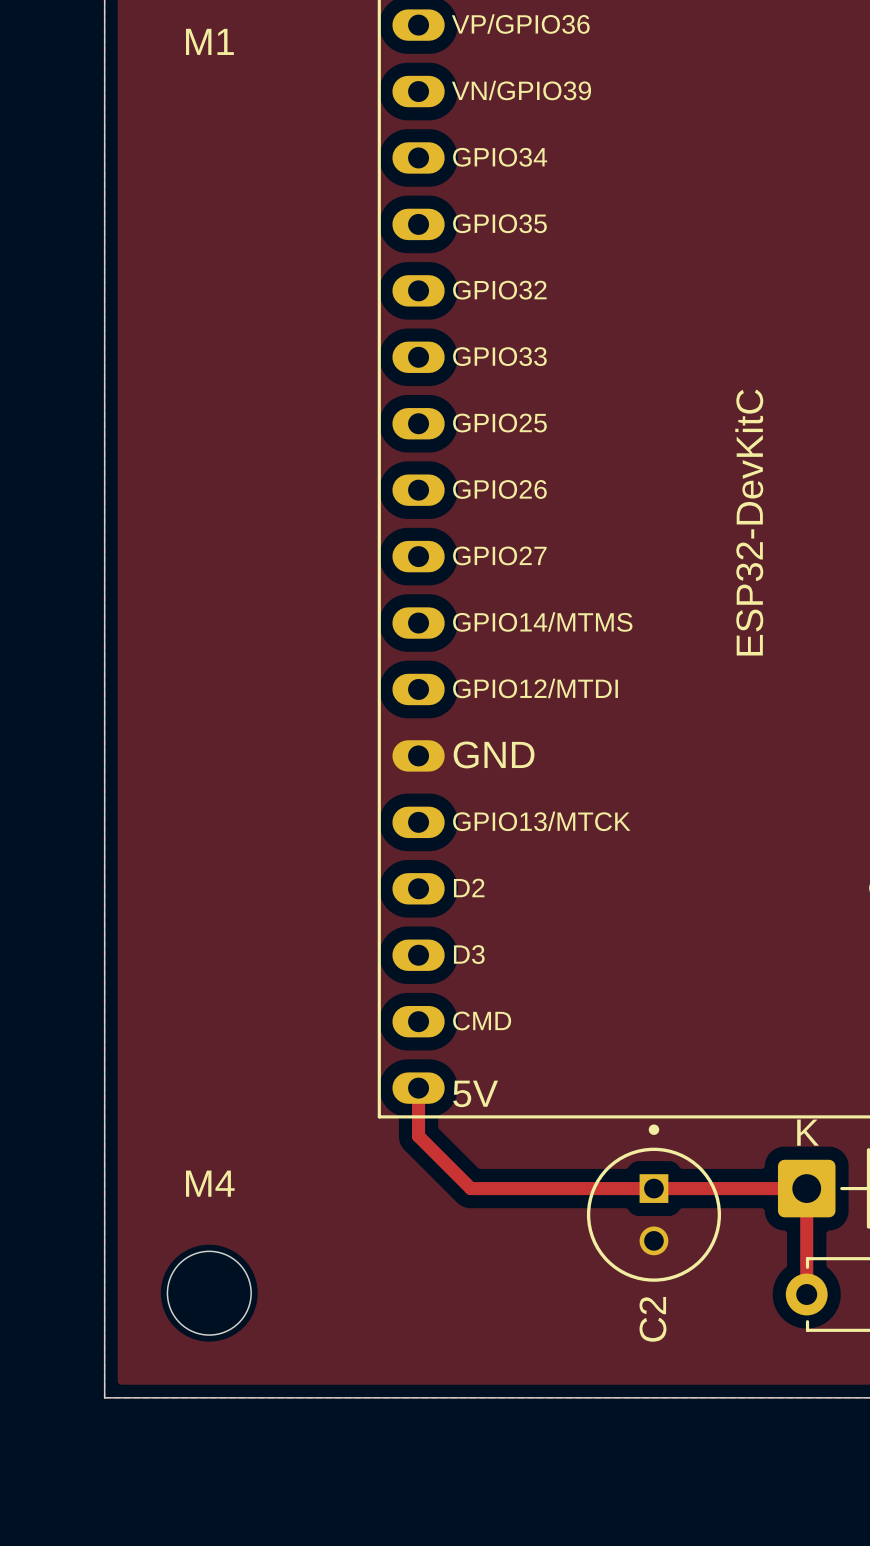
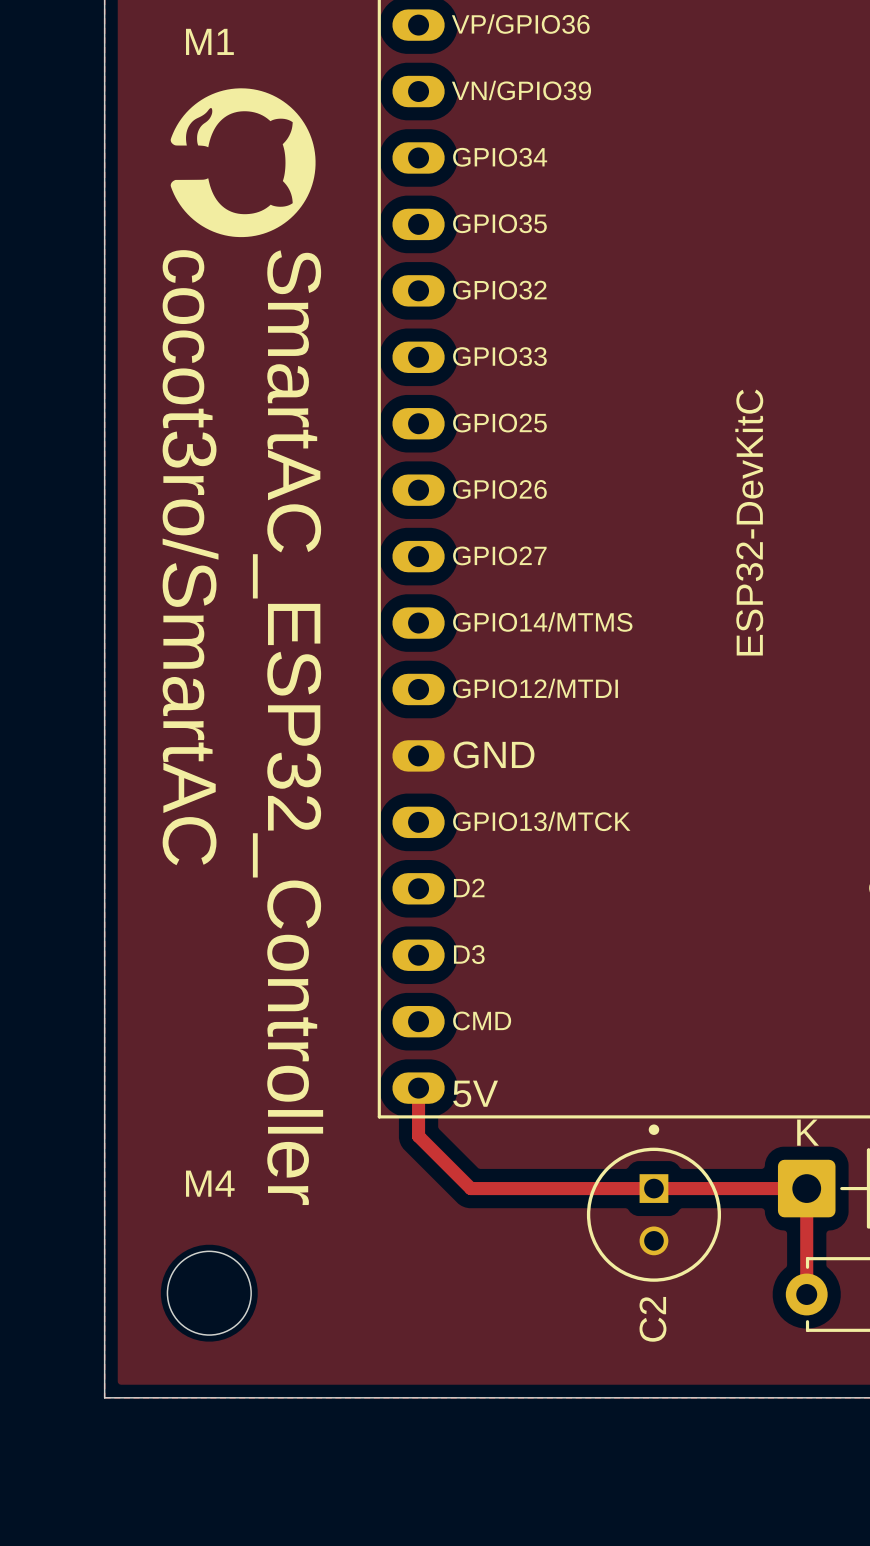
drawing: none -> [170, 88, 316, 238]
text: none -> cocot3ro/SmartAC (190, 557)
text: none -> SmartAC_ESP32_Controller (288, 727)

